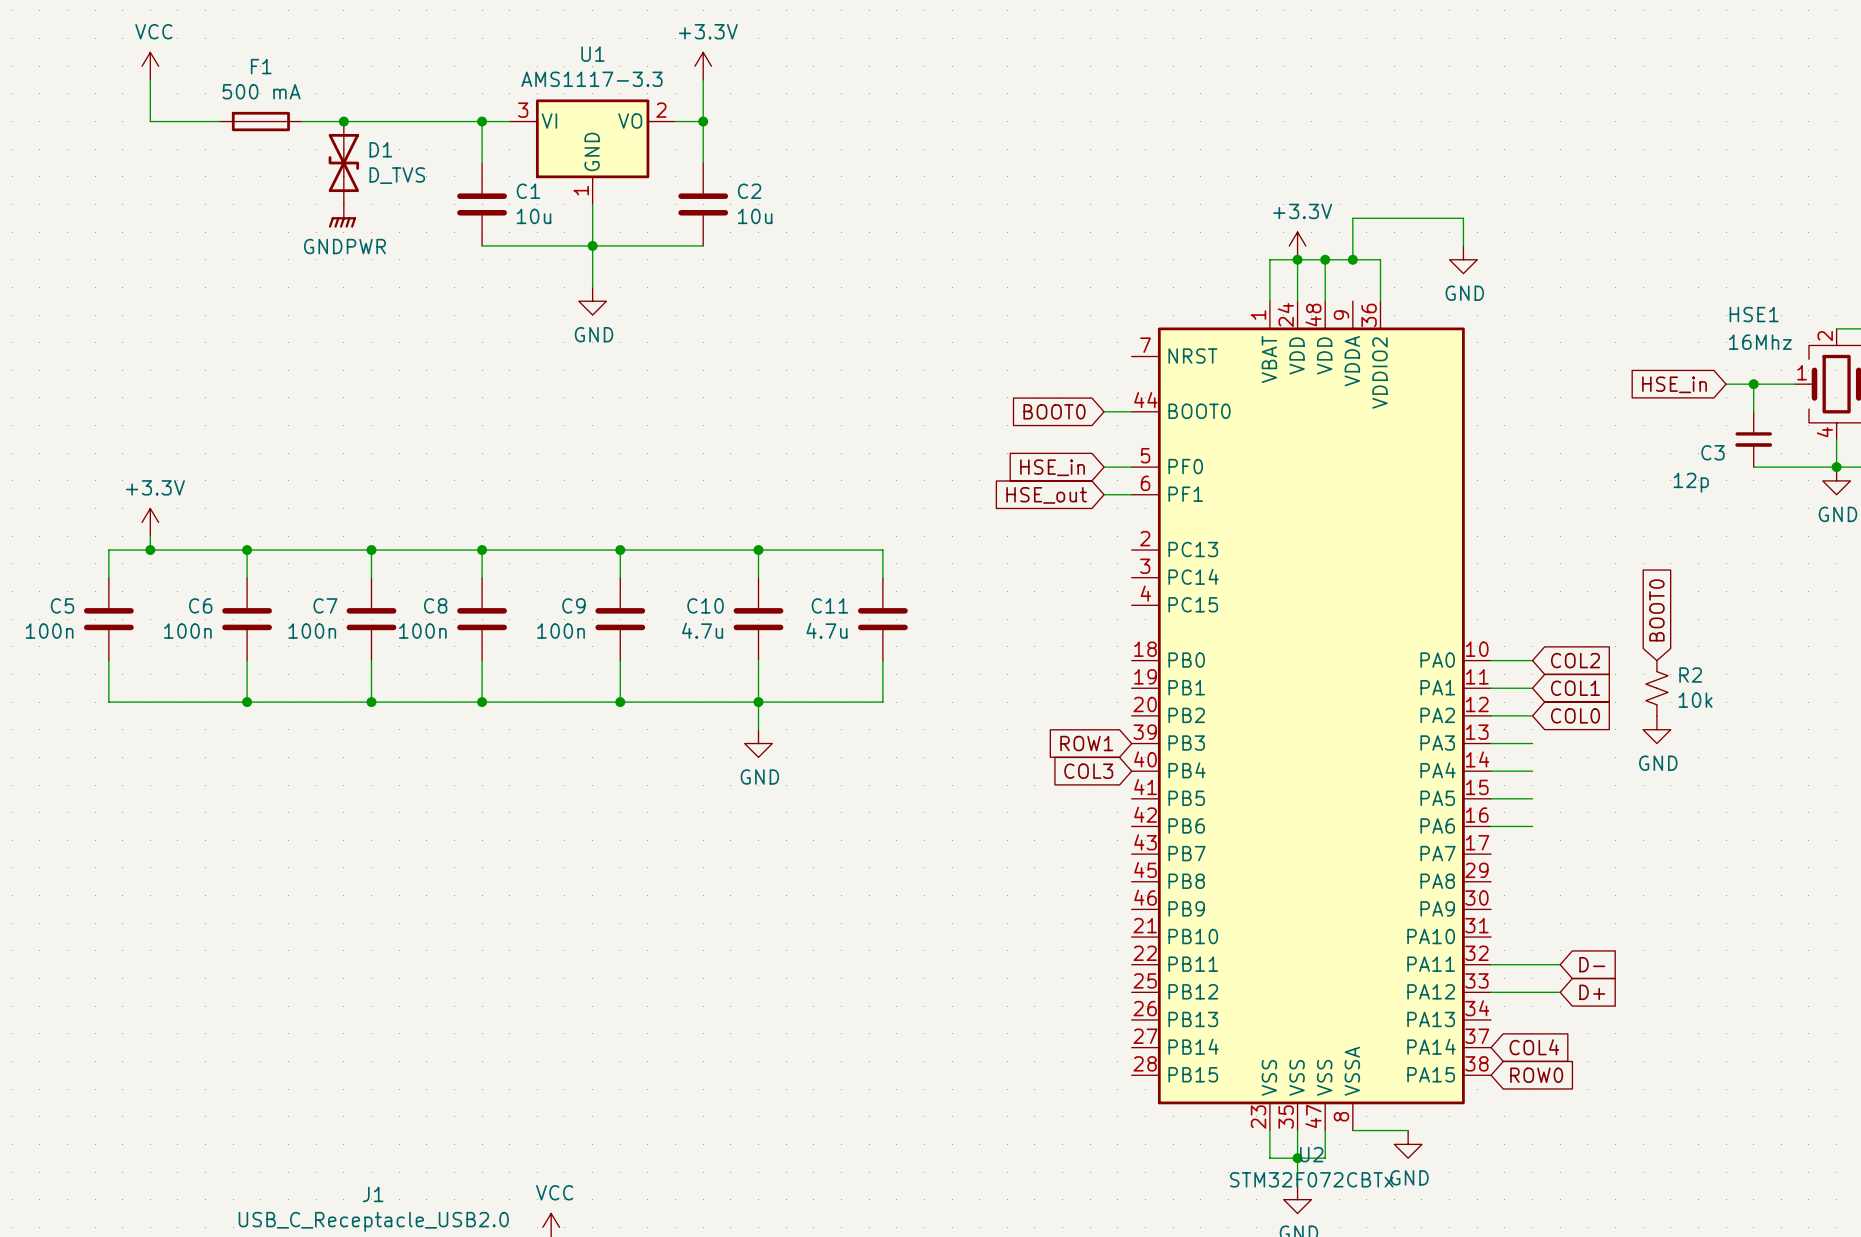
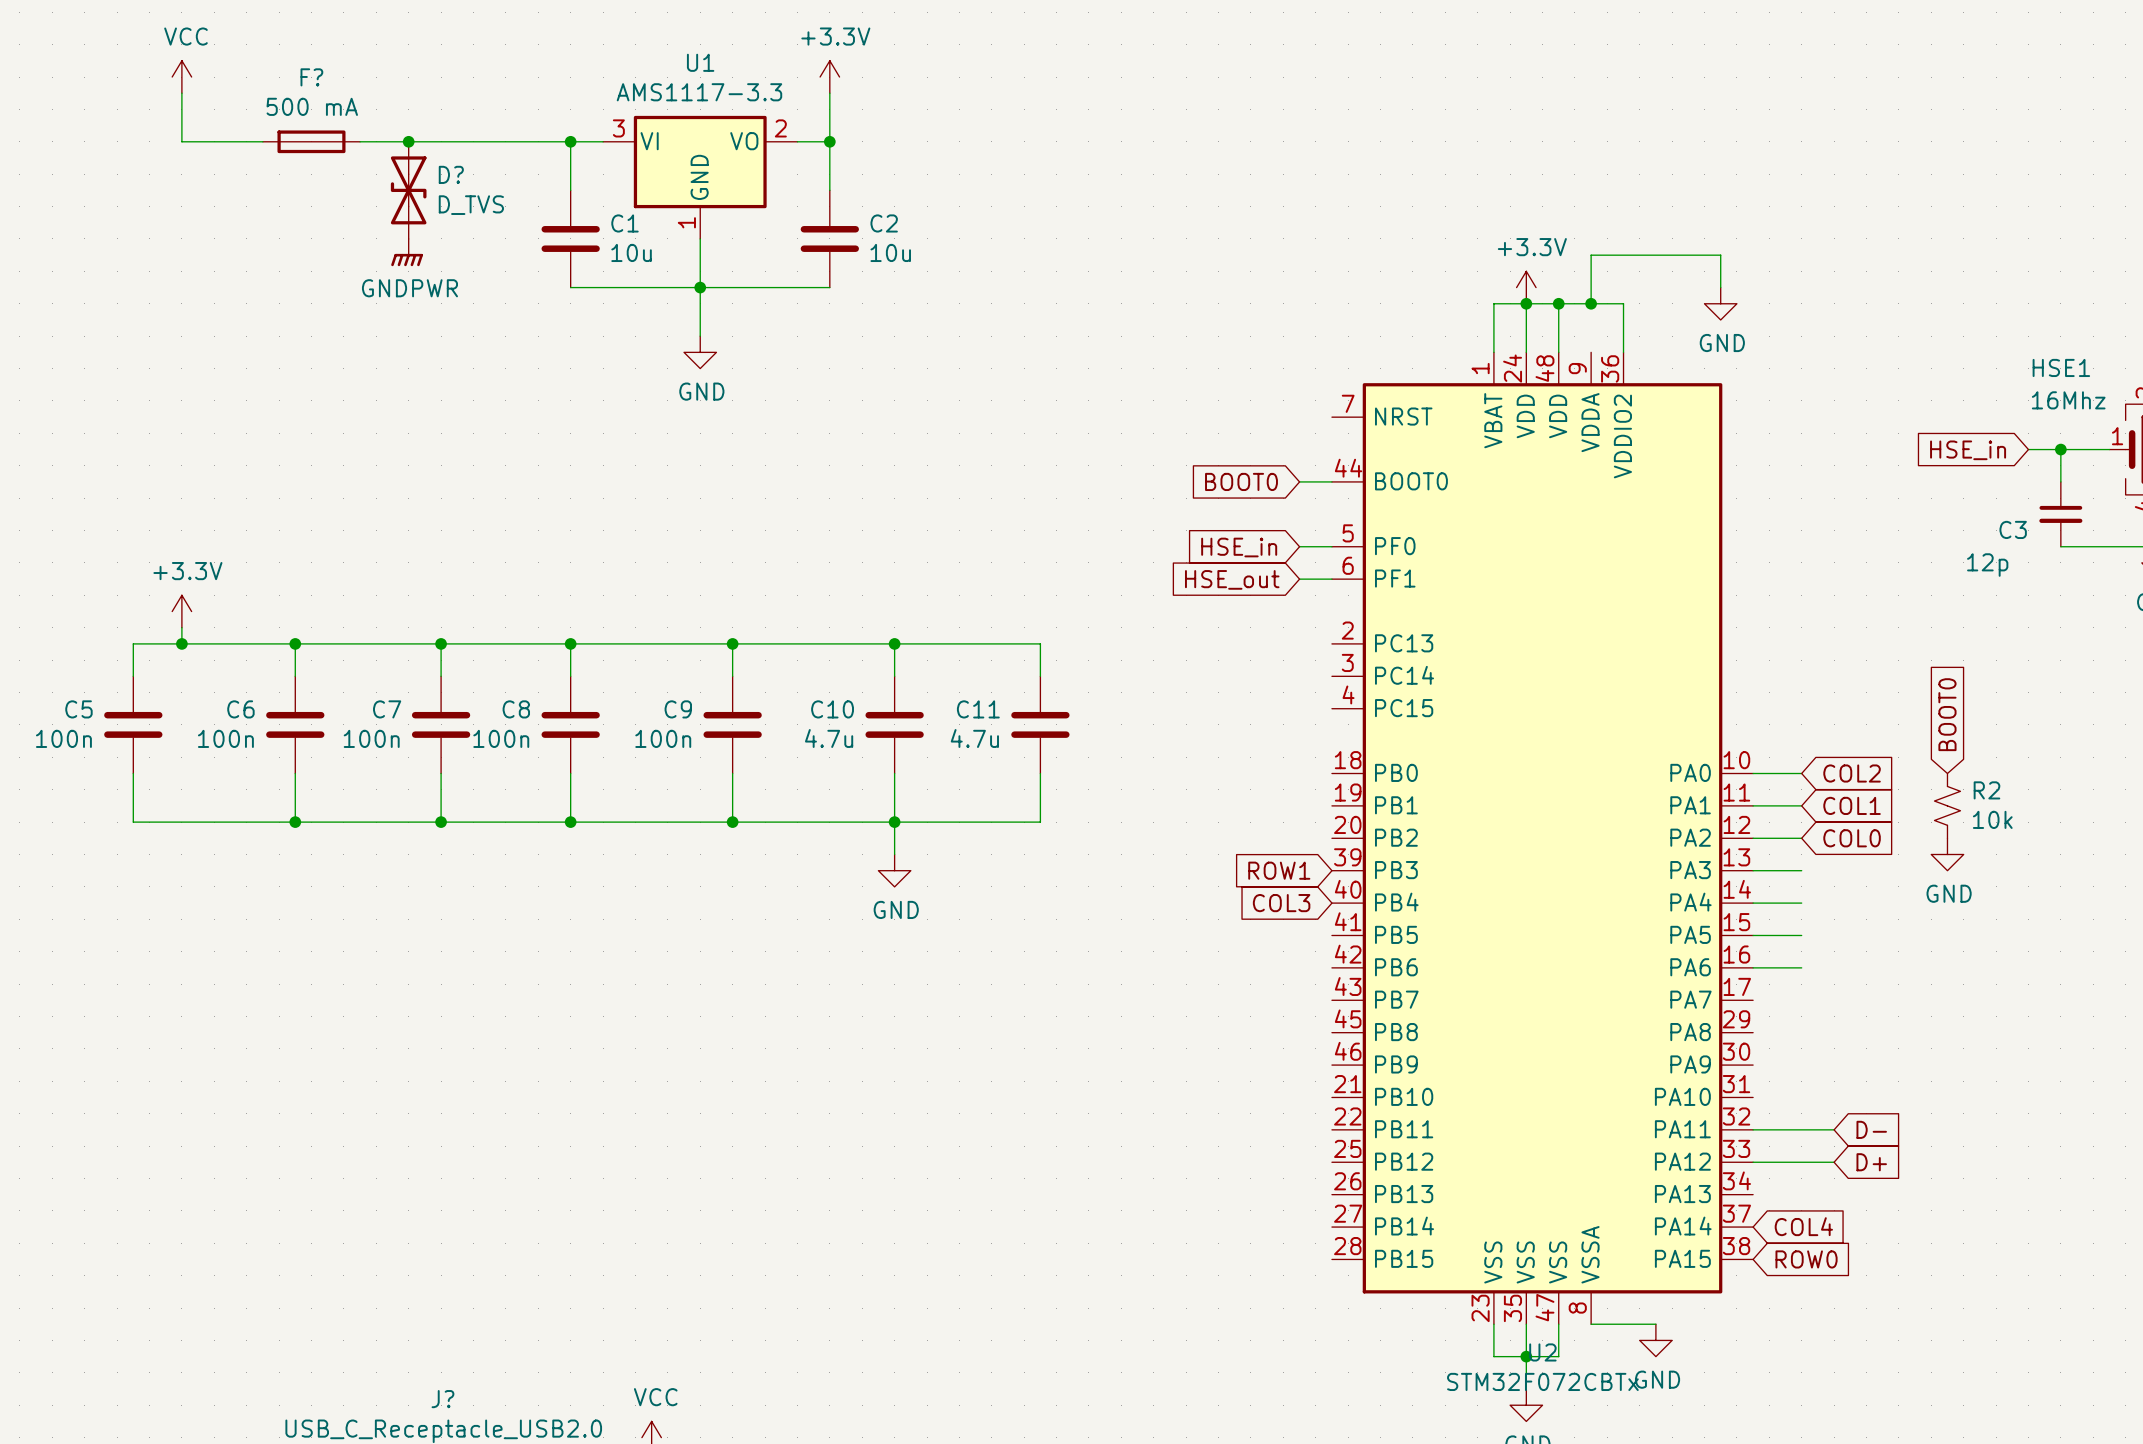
F1 name: F1 (261, 66) -> F? (311, 77)
D1 name: D1 (380, 149) -> D? (451, 174)
J1 name: J1 (373, 1194) -> J? (442, 1399)

